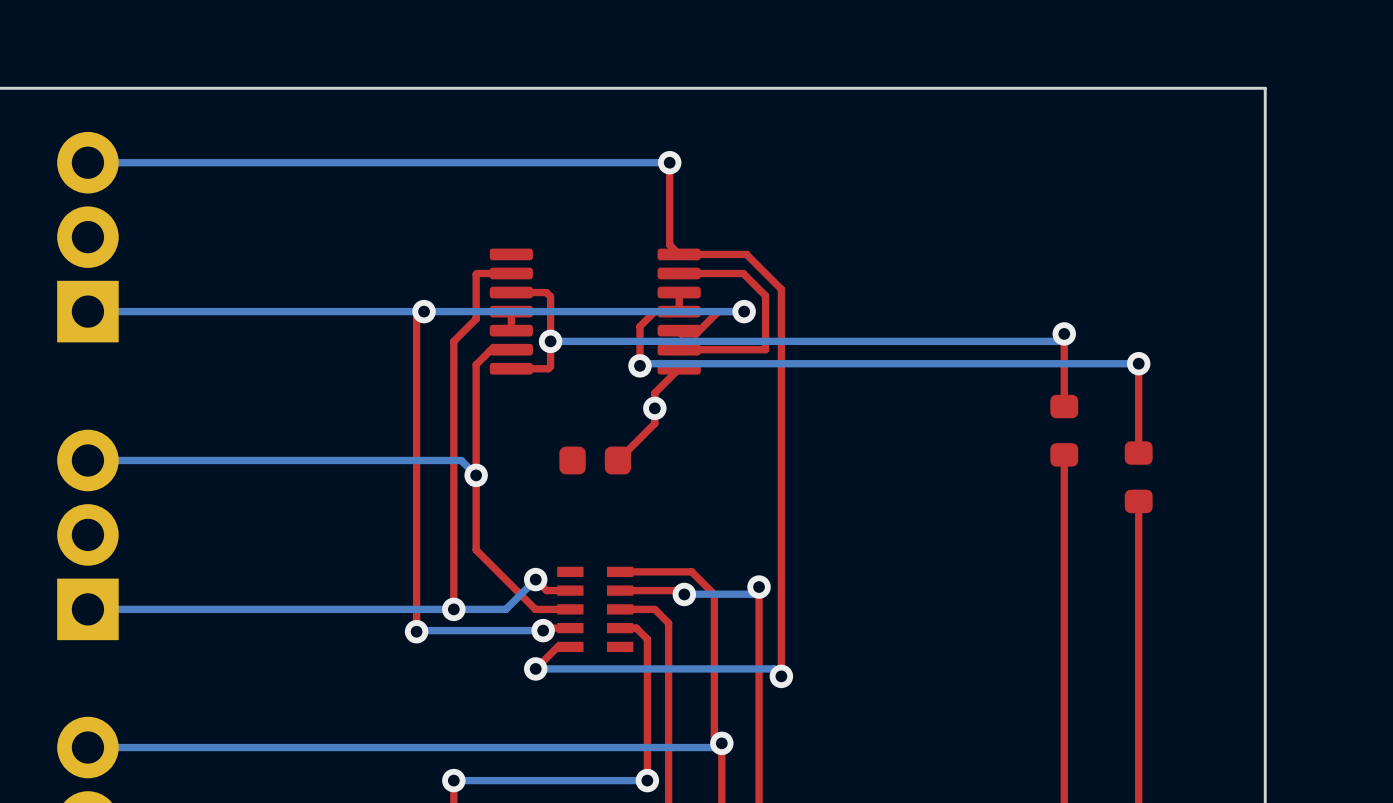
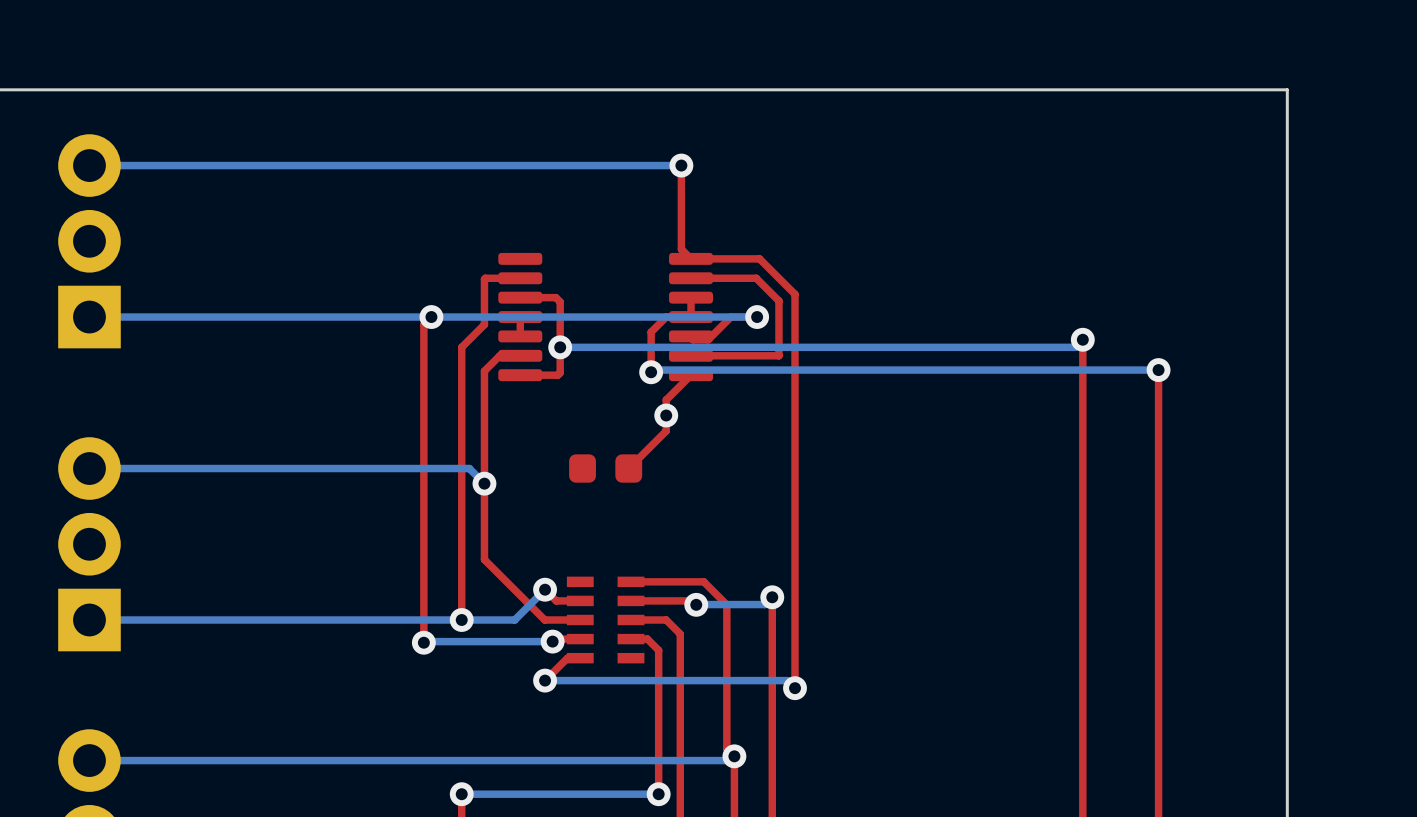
top track: none -> (1082, 413) (1082, 462)
part: (1064, 430) -> none
top track: none -> (1158, 460) (1158, 510)
part: (1138, 477) -> none

